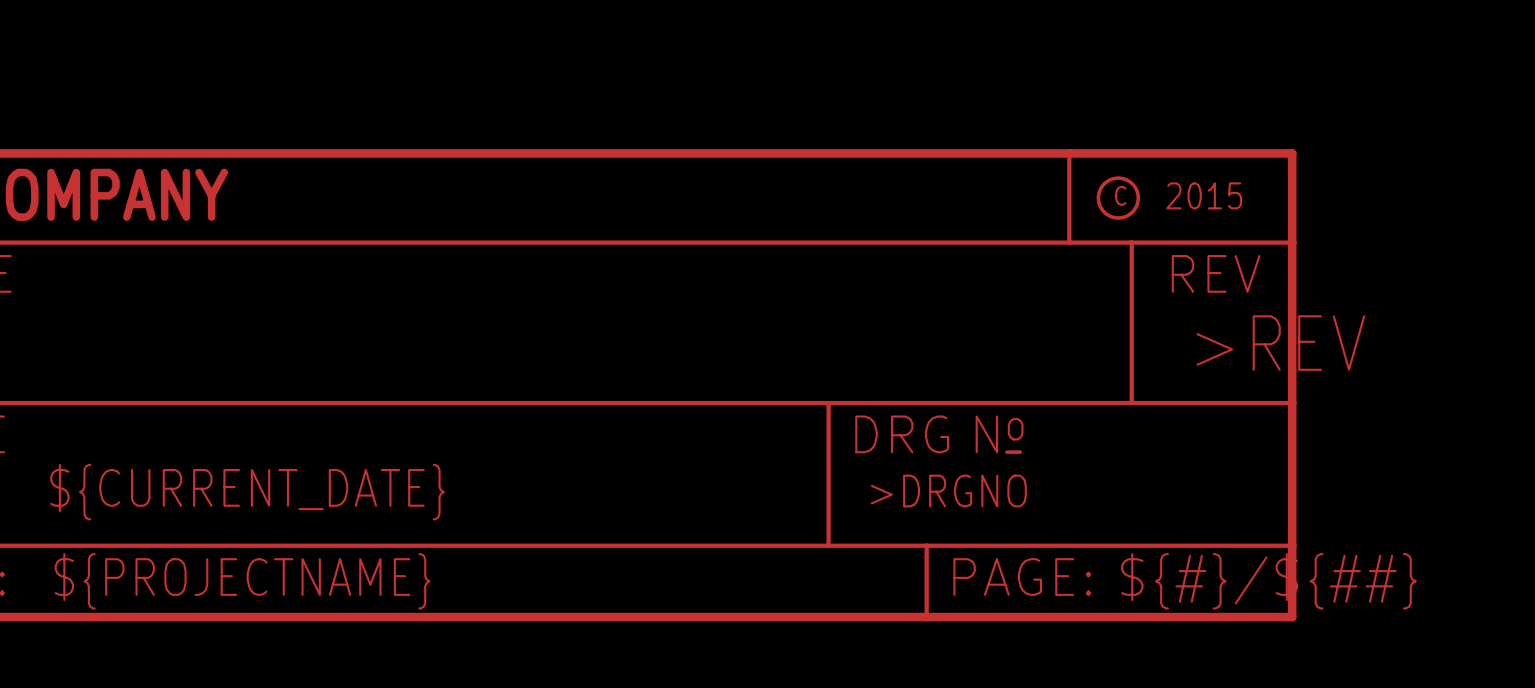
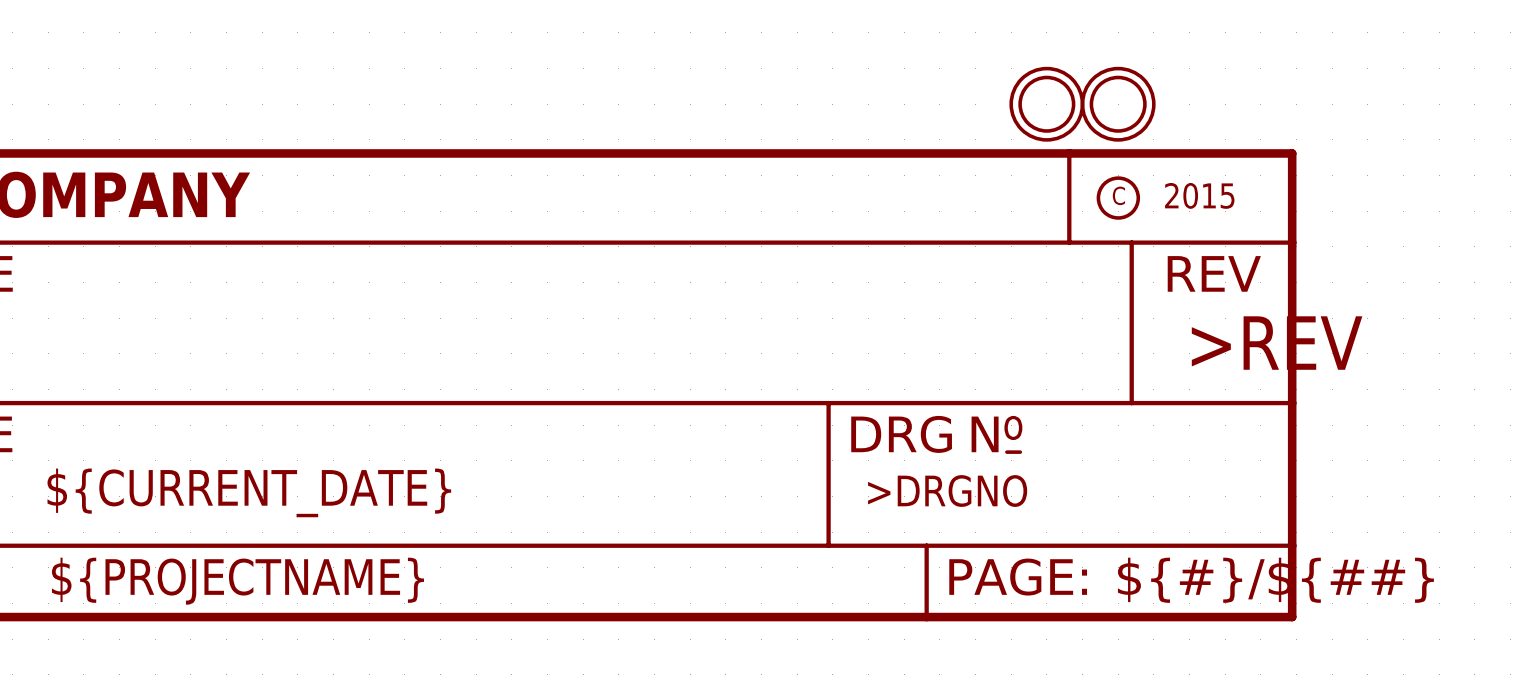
part: none -> (1046, 104)
part: none -> (1118, 104)

